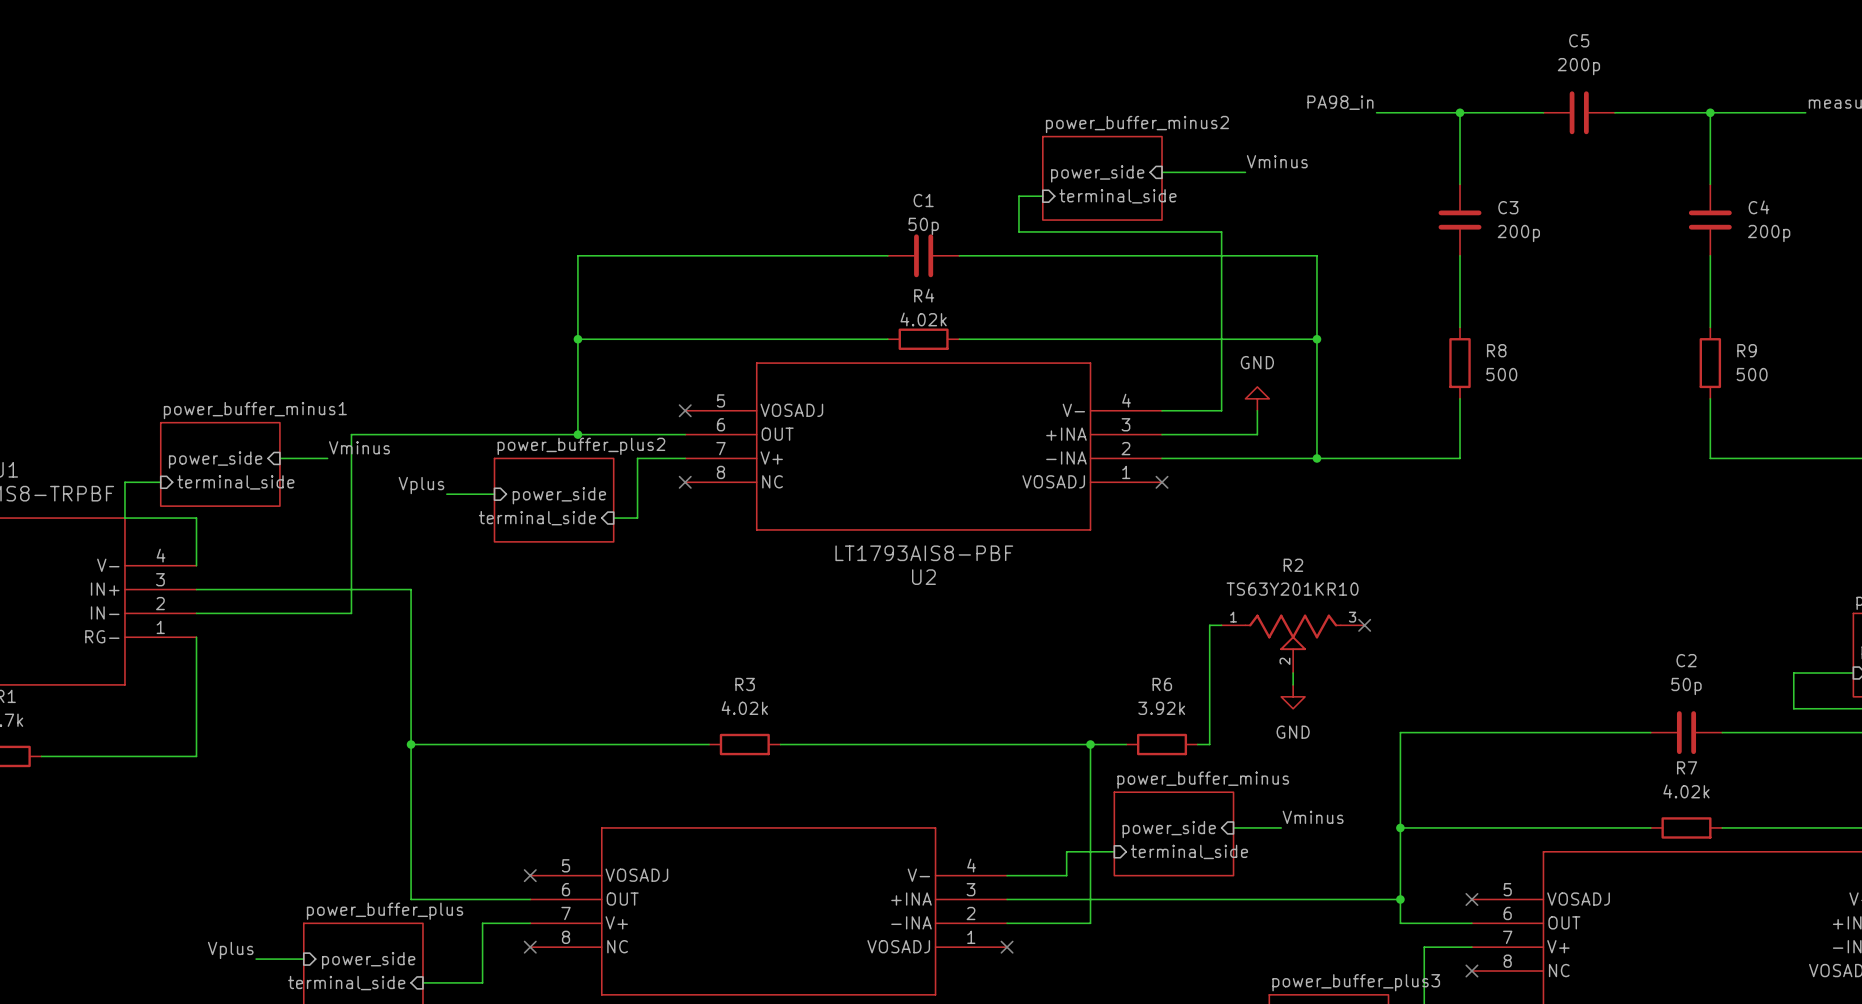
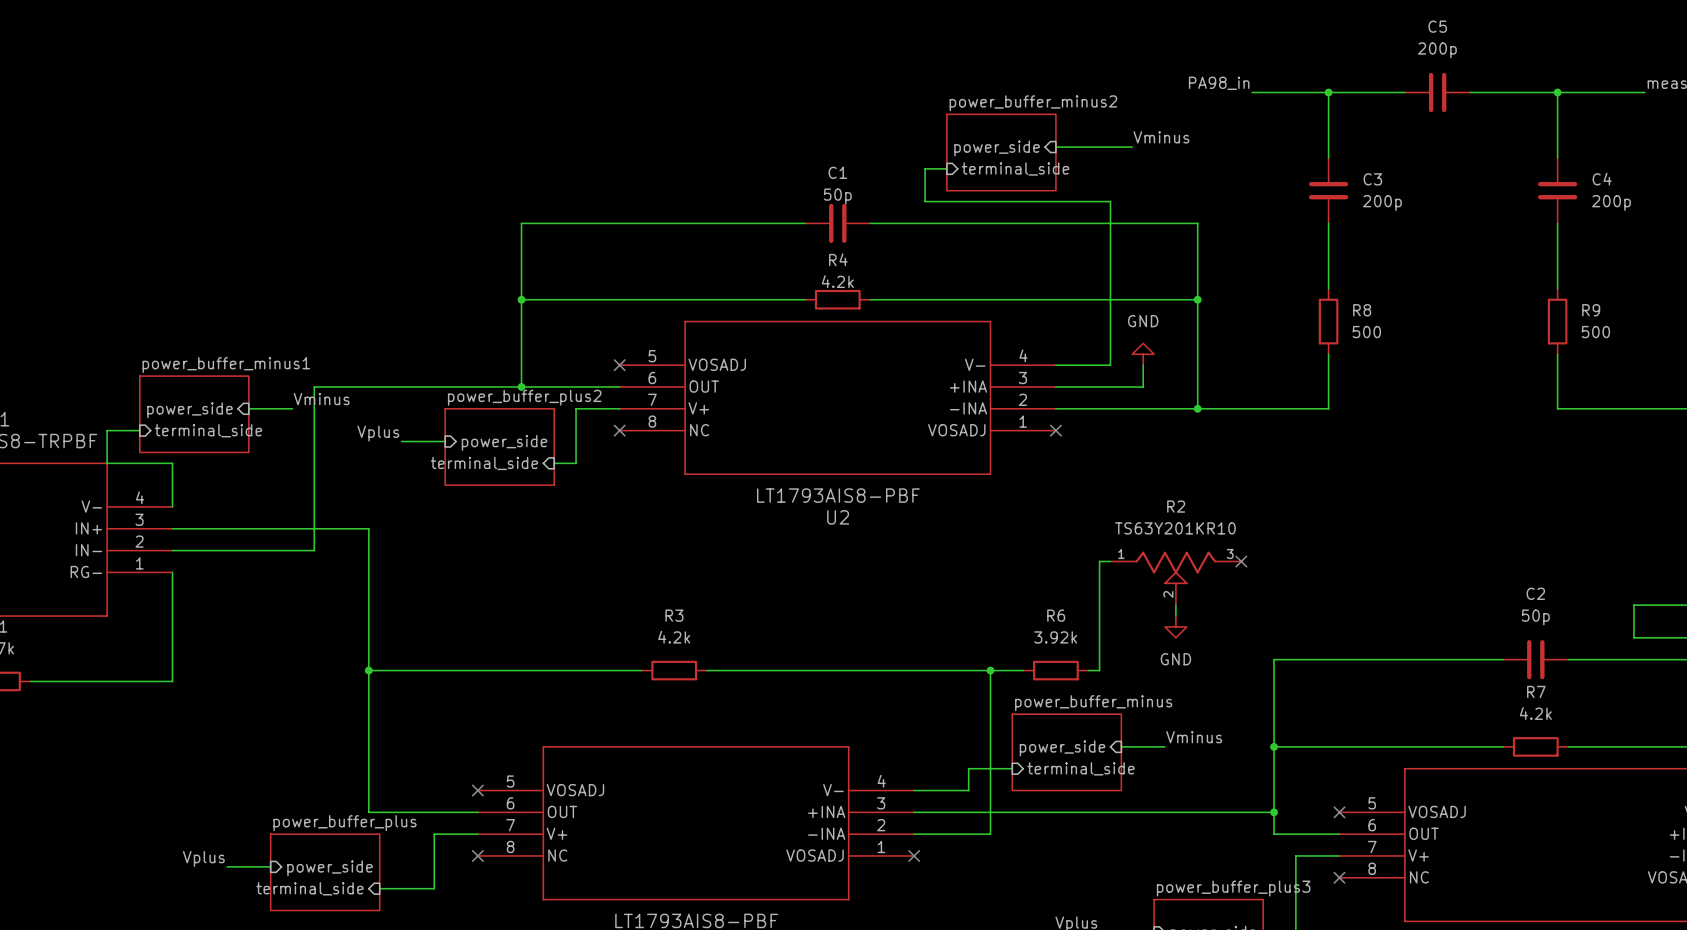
R4 value: 4.02k (923, 319) -> 4.2k (837, 281)
R3 value: 4.02k (744, 708) -> 4.2k (674, 637)
R7 value: 4.02k (1686, 791) -> 4.2k (1535, 713)

